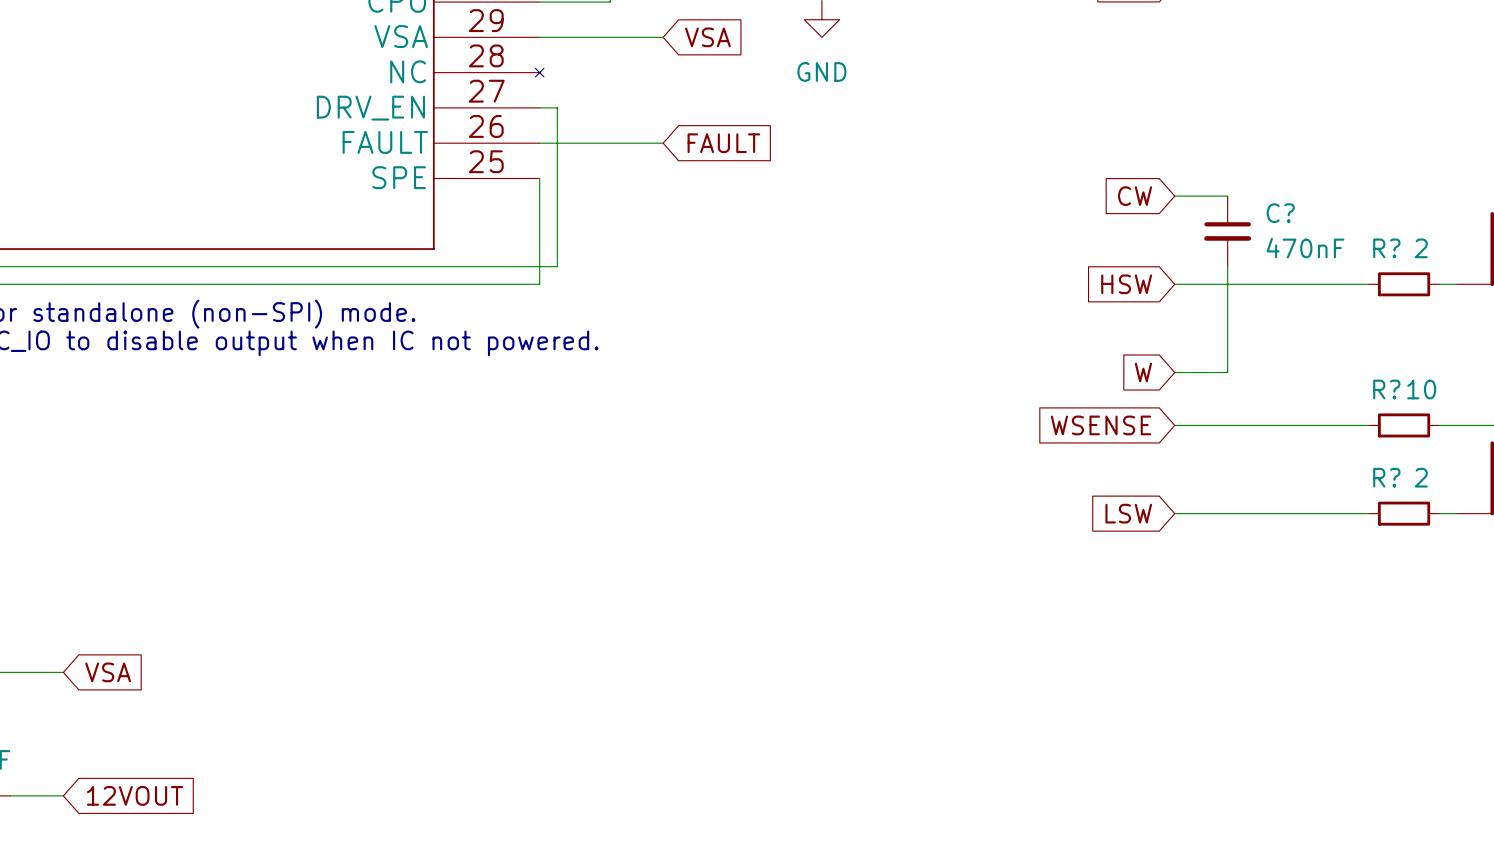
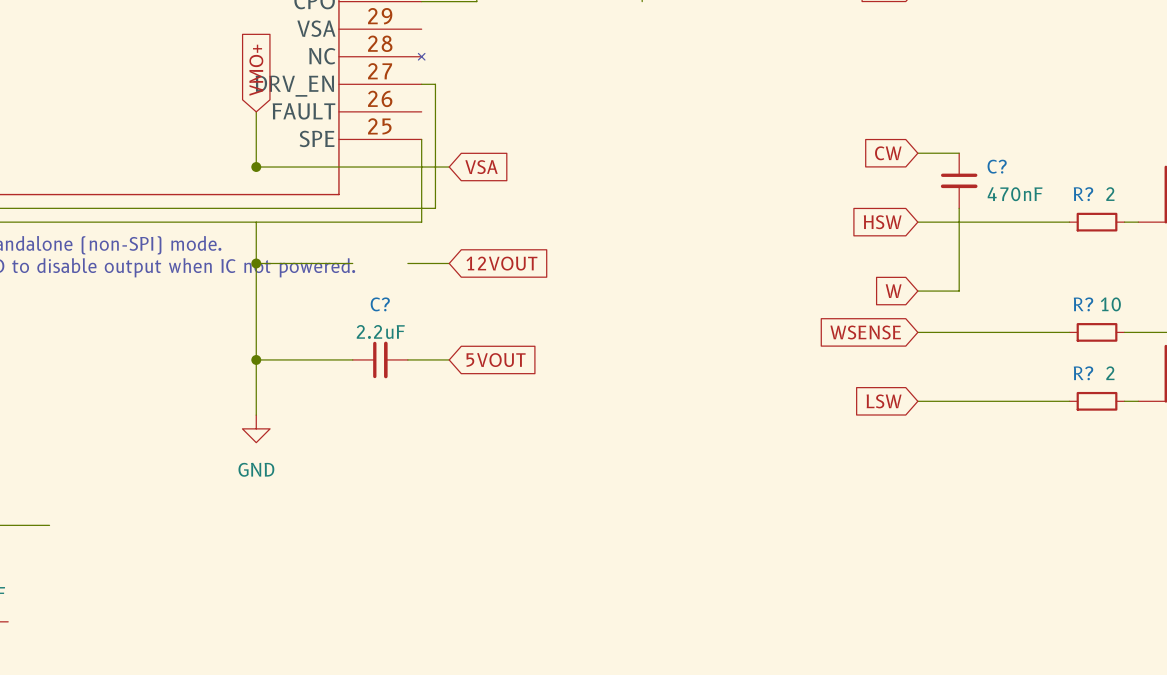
power symbol: GND (821, 19) -> none
wire: (539, 37) (663, 37) -> none
global label position: VSA (707, 37) -> VSA (481, 167)
global label: none -> VMO+ (256, 70)
wire: none -> (256, 111) (256, 167) (449, 167)
wire: (539, 143) (663, 143) -> (256, 263) (352, 263)
global label: FAULT (723, 143) -> none
junction: none -> (256, 167)
wire: none -> (256, 222) (256, 415)
junction: none -> (256, 263)
wire: none -> (407, 263) (449, 263)
global label: none -> 12VOUT (501, 263)
wire: none -> (256, 359) (352, 359)
junction: none -> (256, 359)
C?: none -> 2.2uF (380, 359)
wire: none -> (407, 359) (449, 359)
global label: none -> 5VOUT (496, 360)
power symbol: none -> GND (256, 428)
global label: VSA (108, 672) -> none
wire: (10, 795) (63, 795) -> none
global label: 12VOUT (135, 795) -> none

